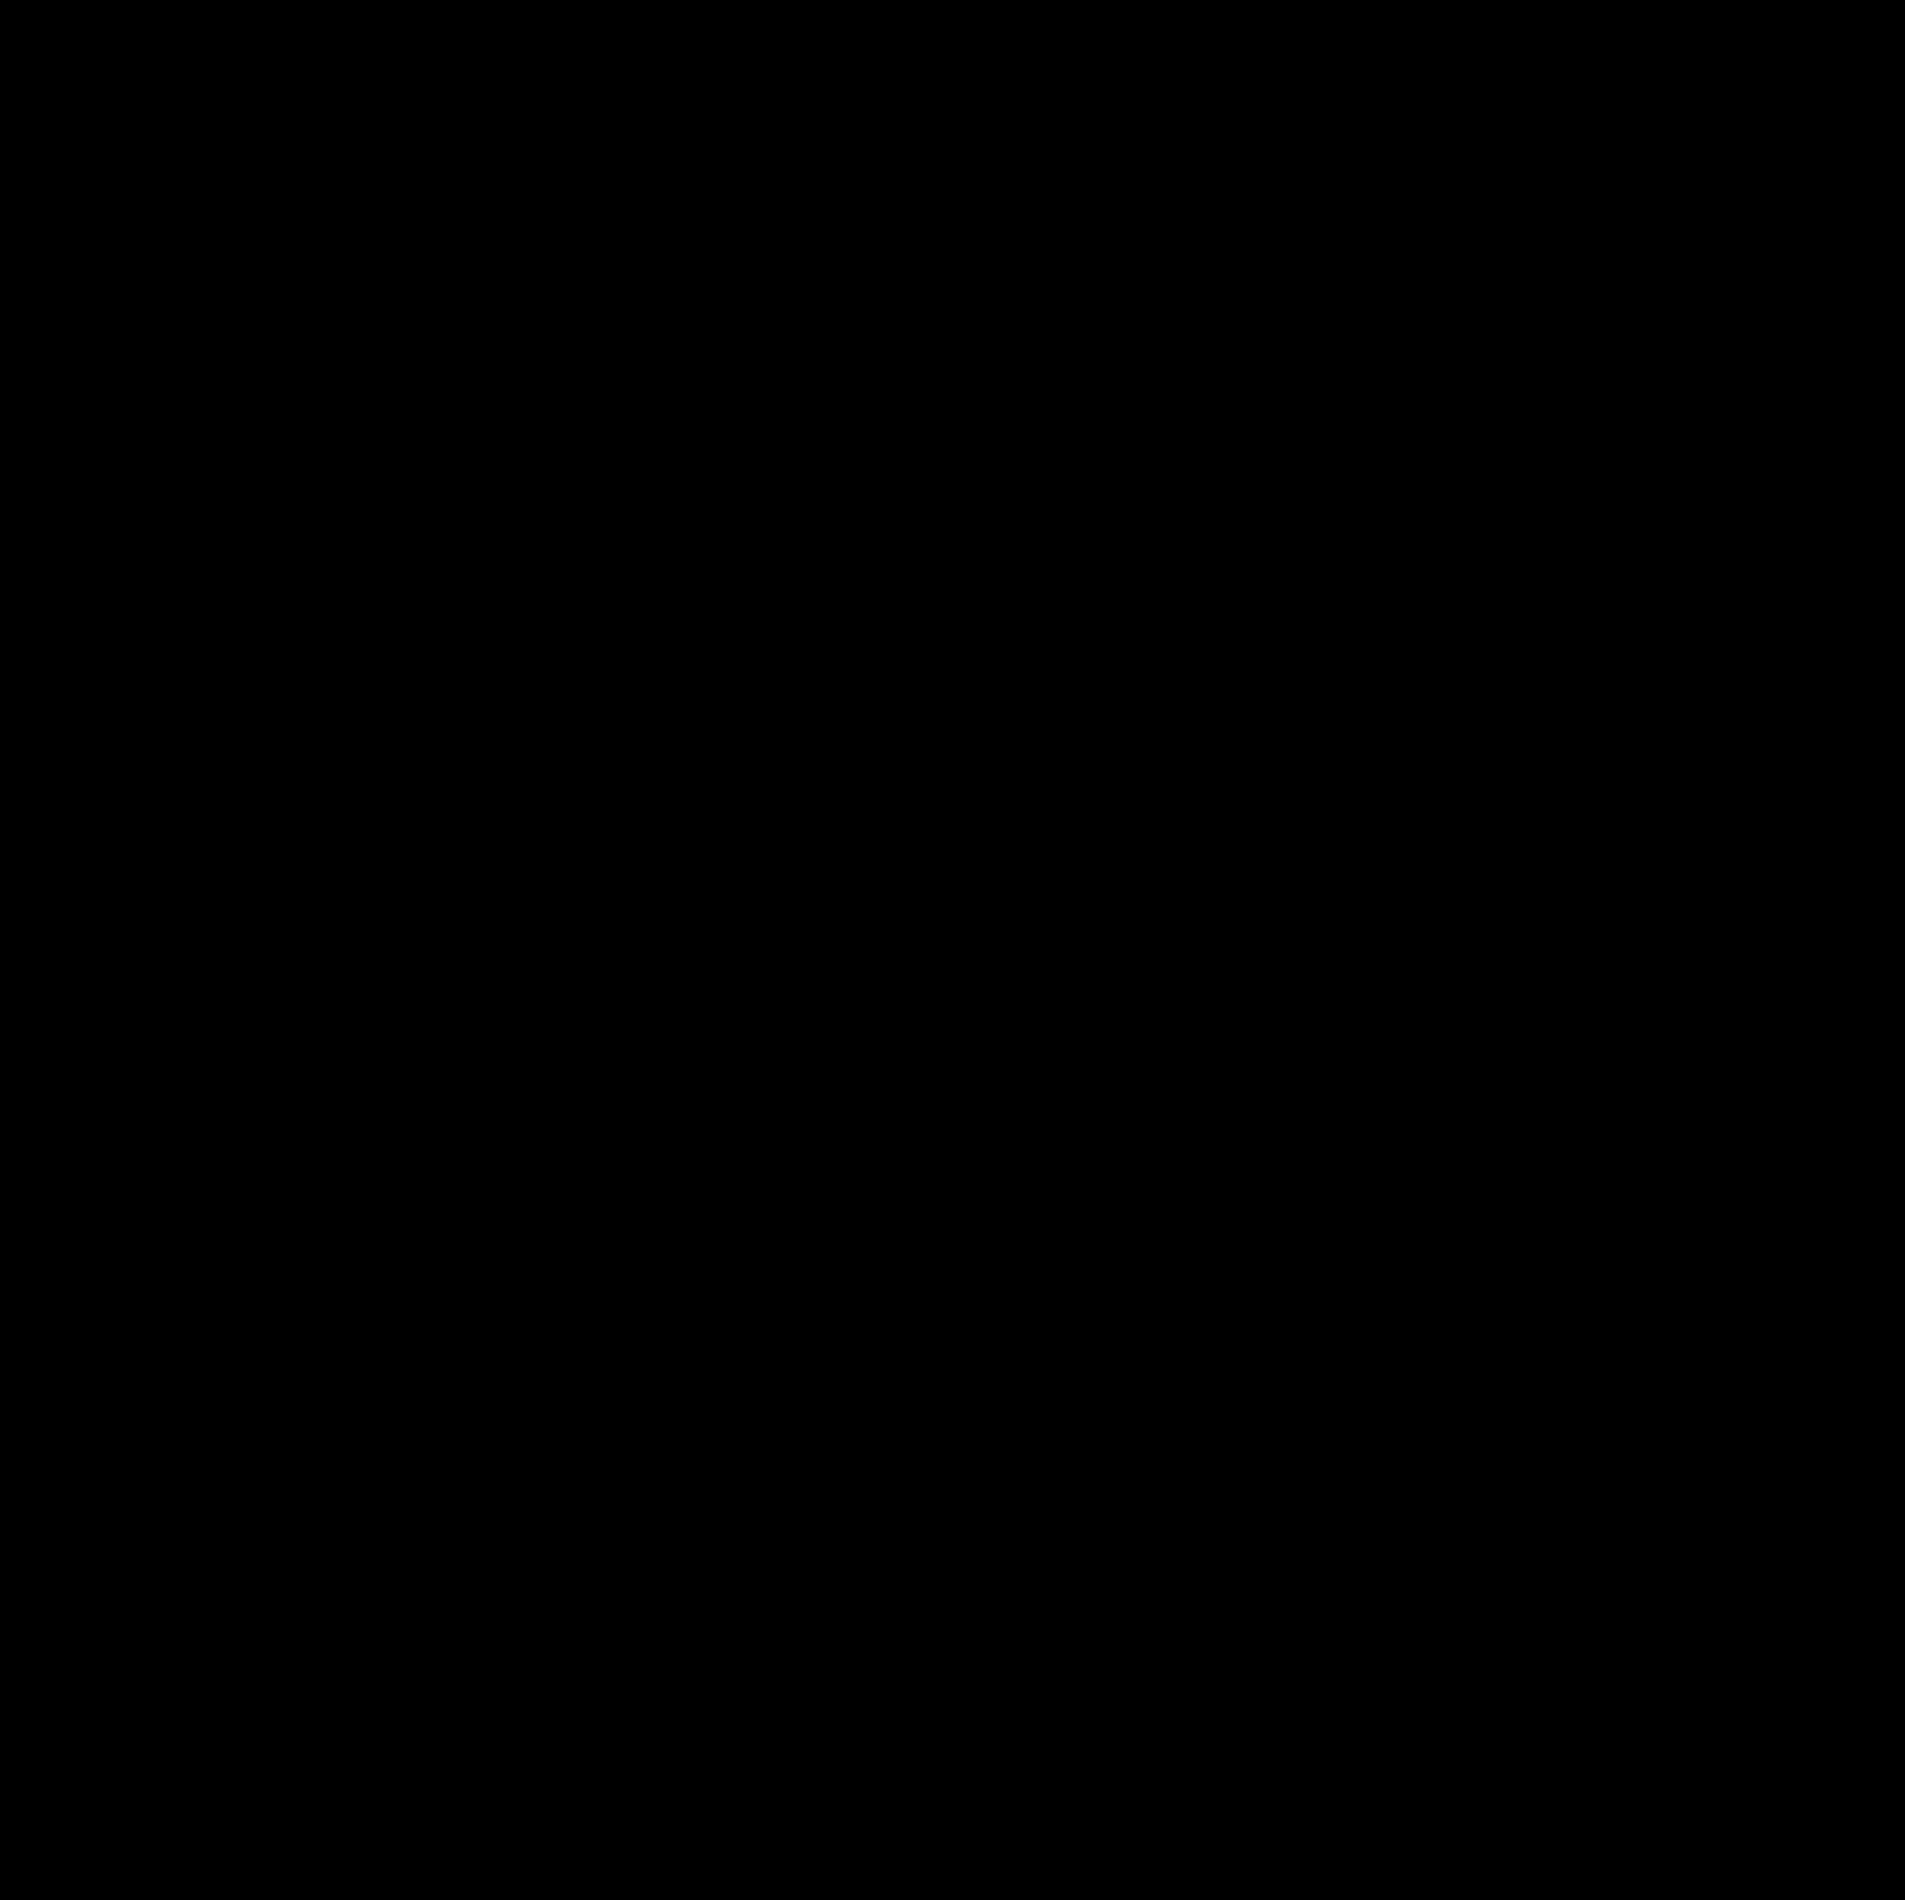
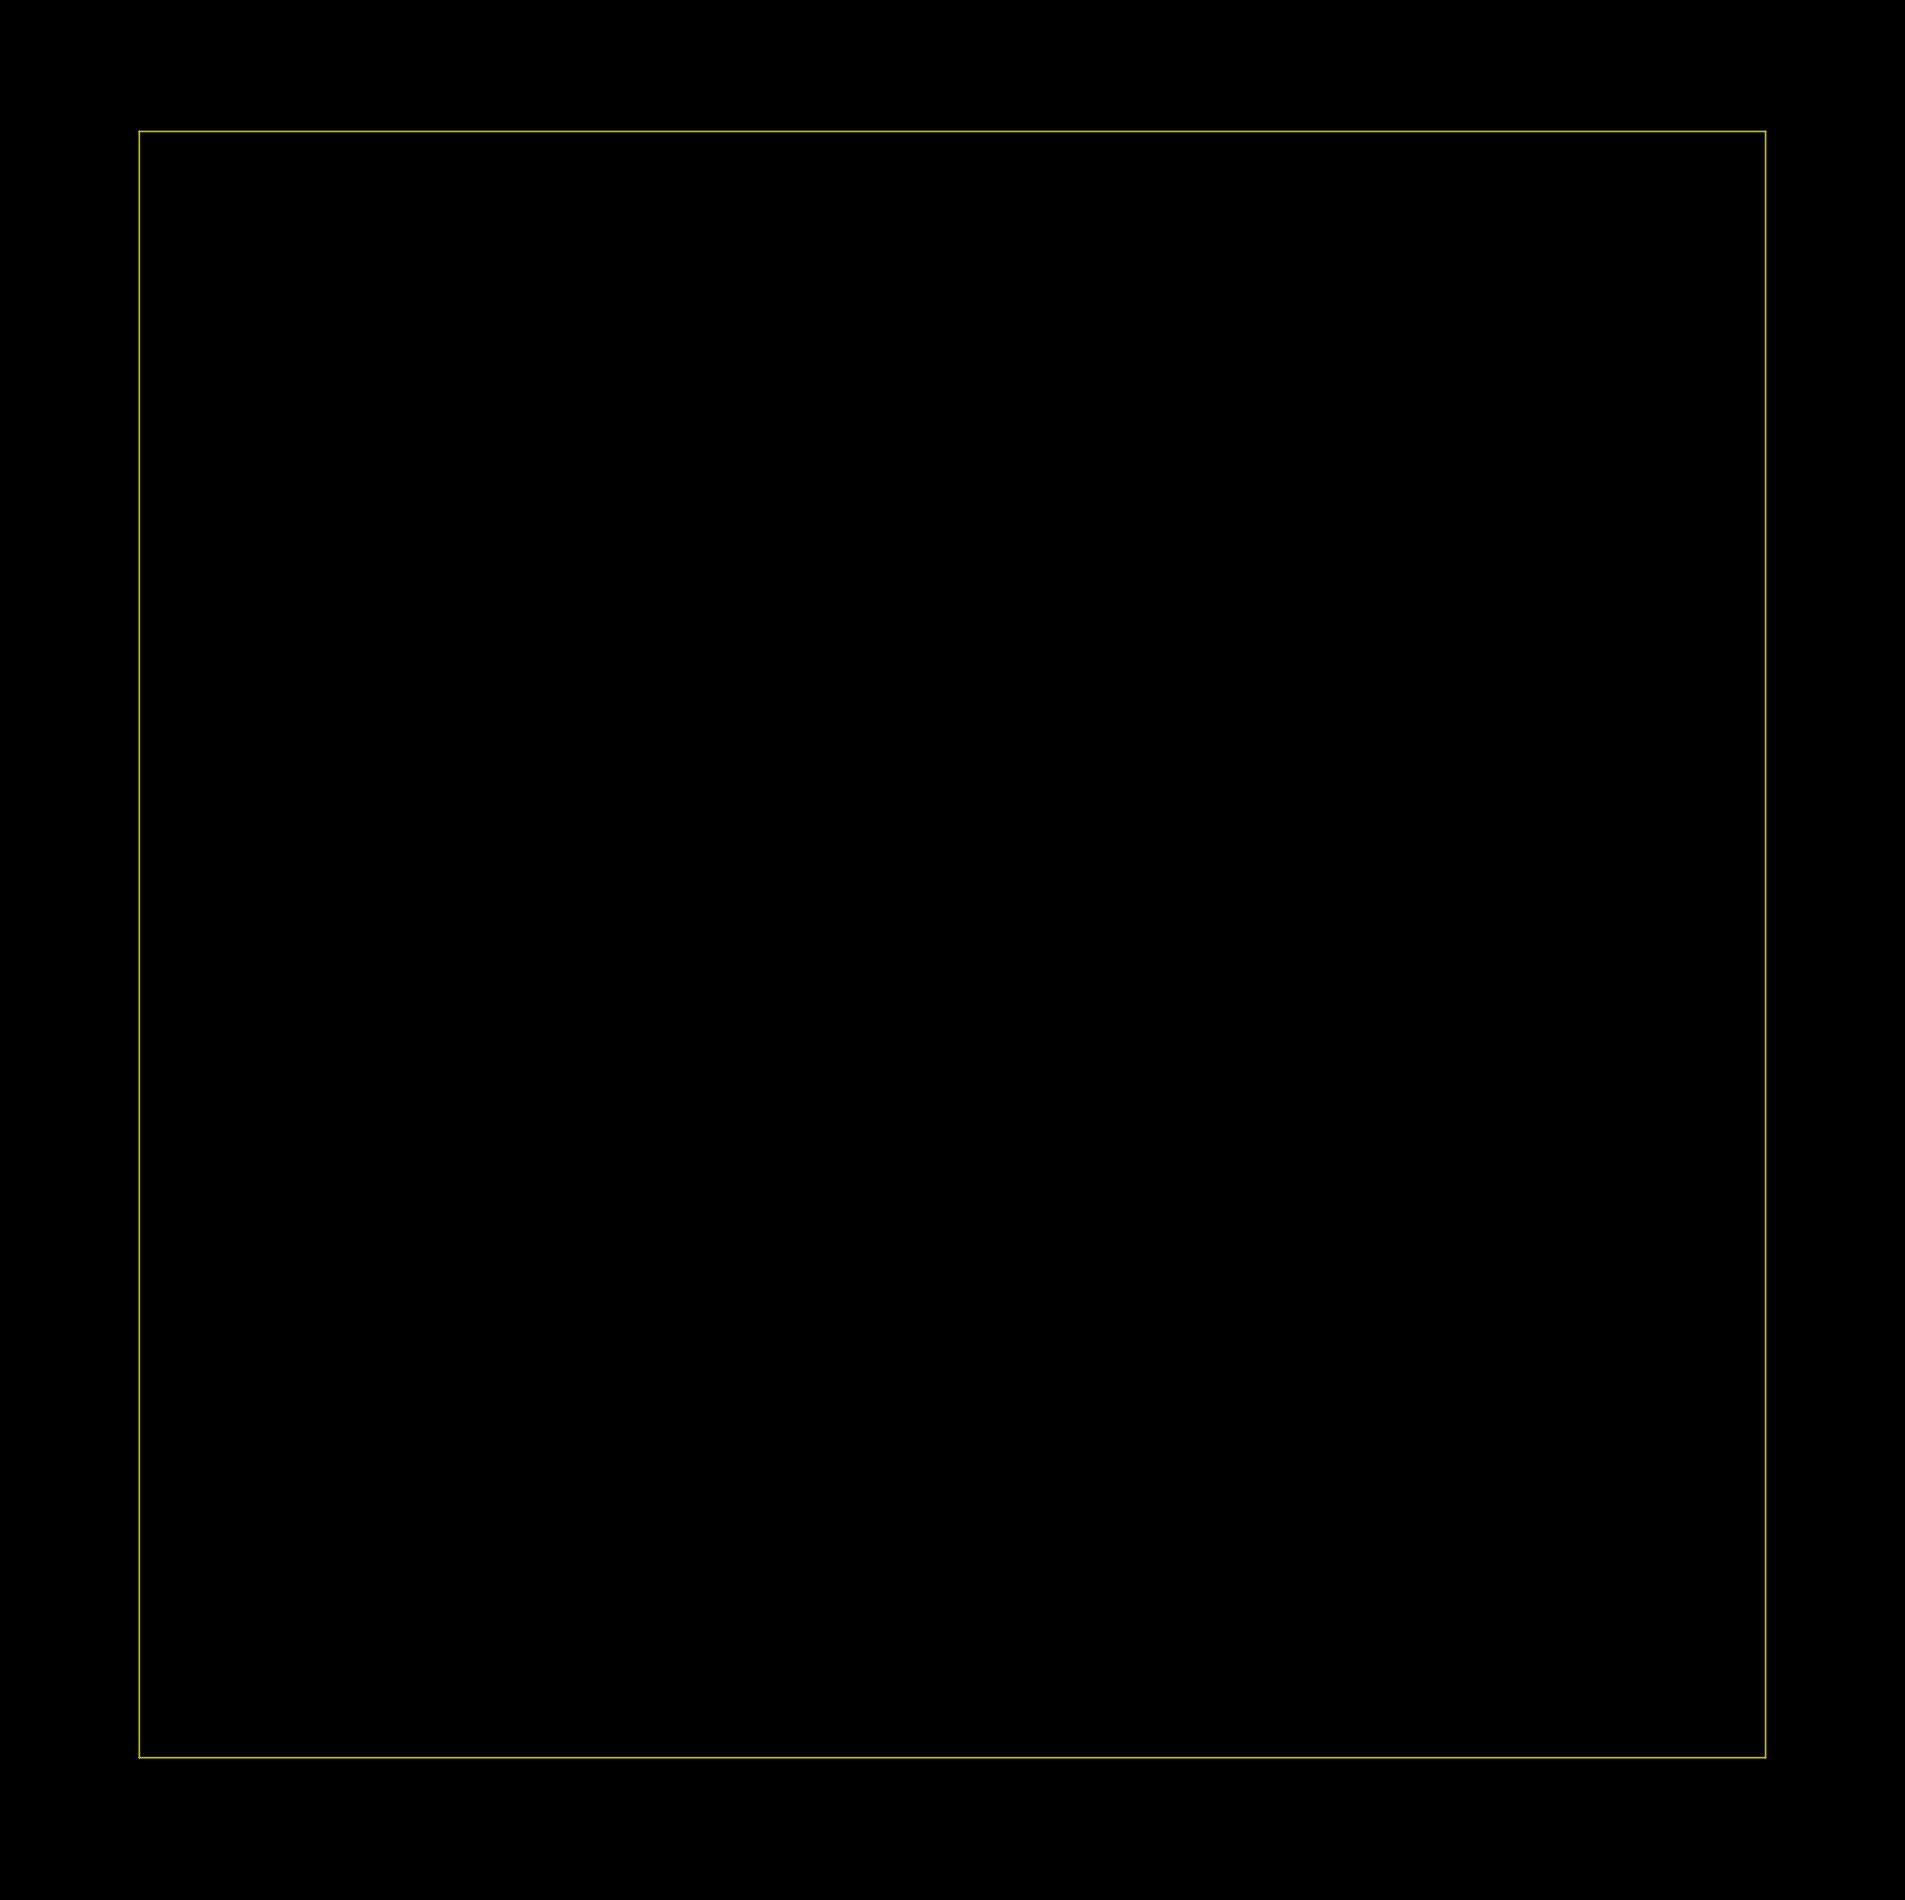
board edge: none -> (1765, 131) (139, 131) (139, 1757) (1765, 1757) (1765, 131)

